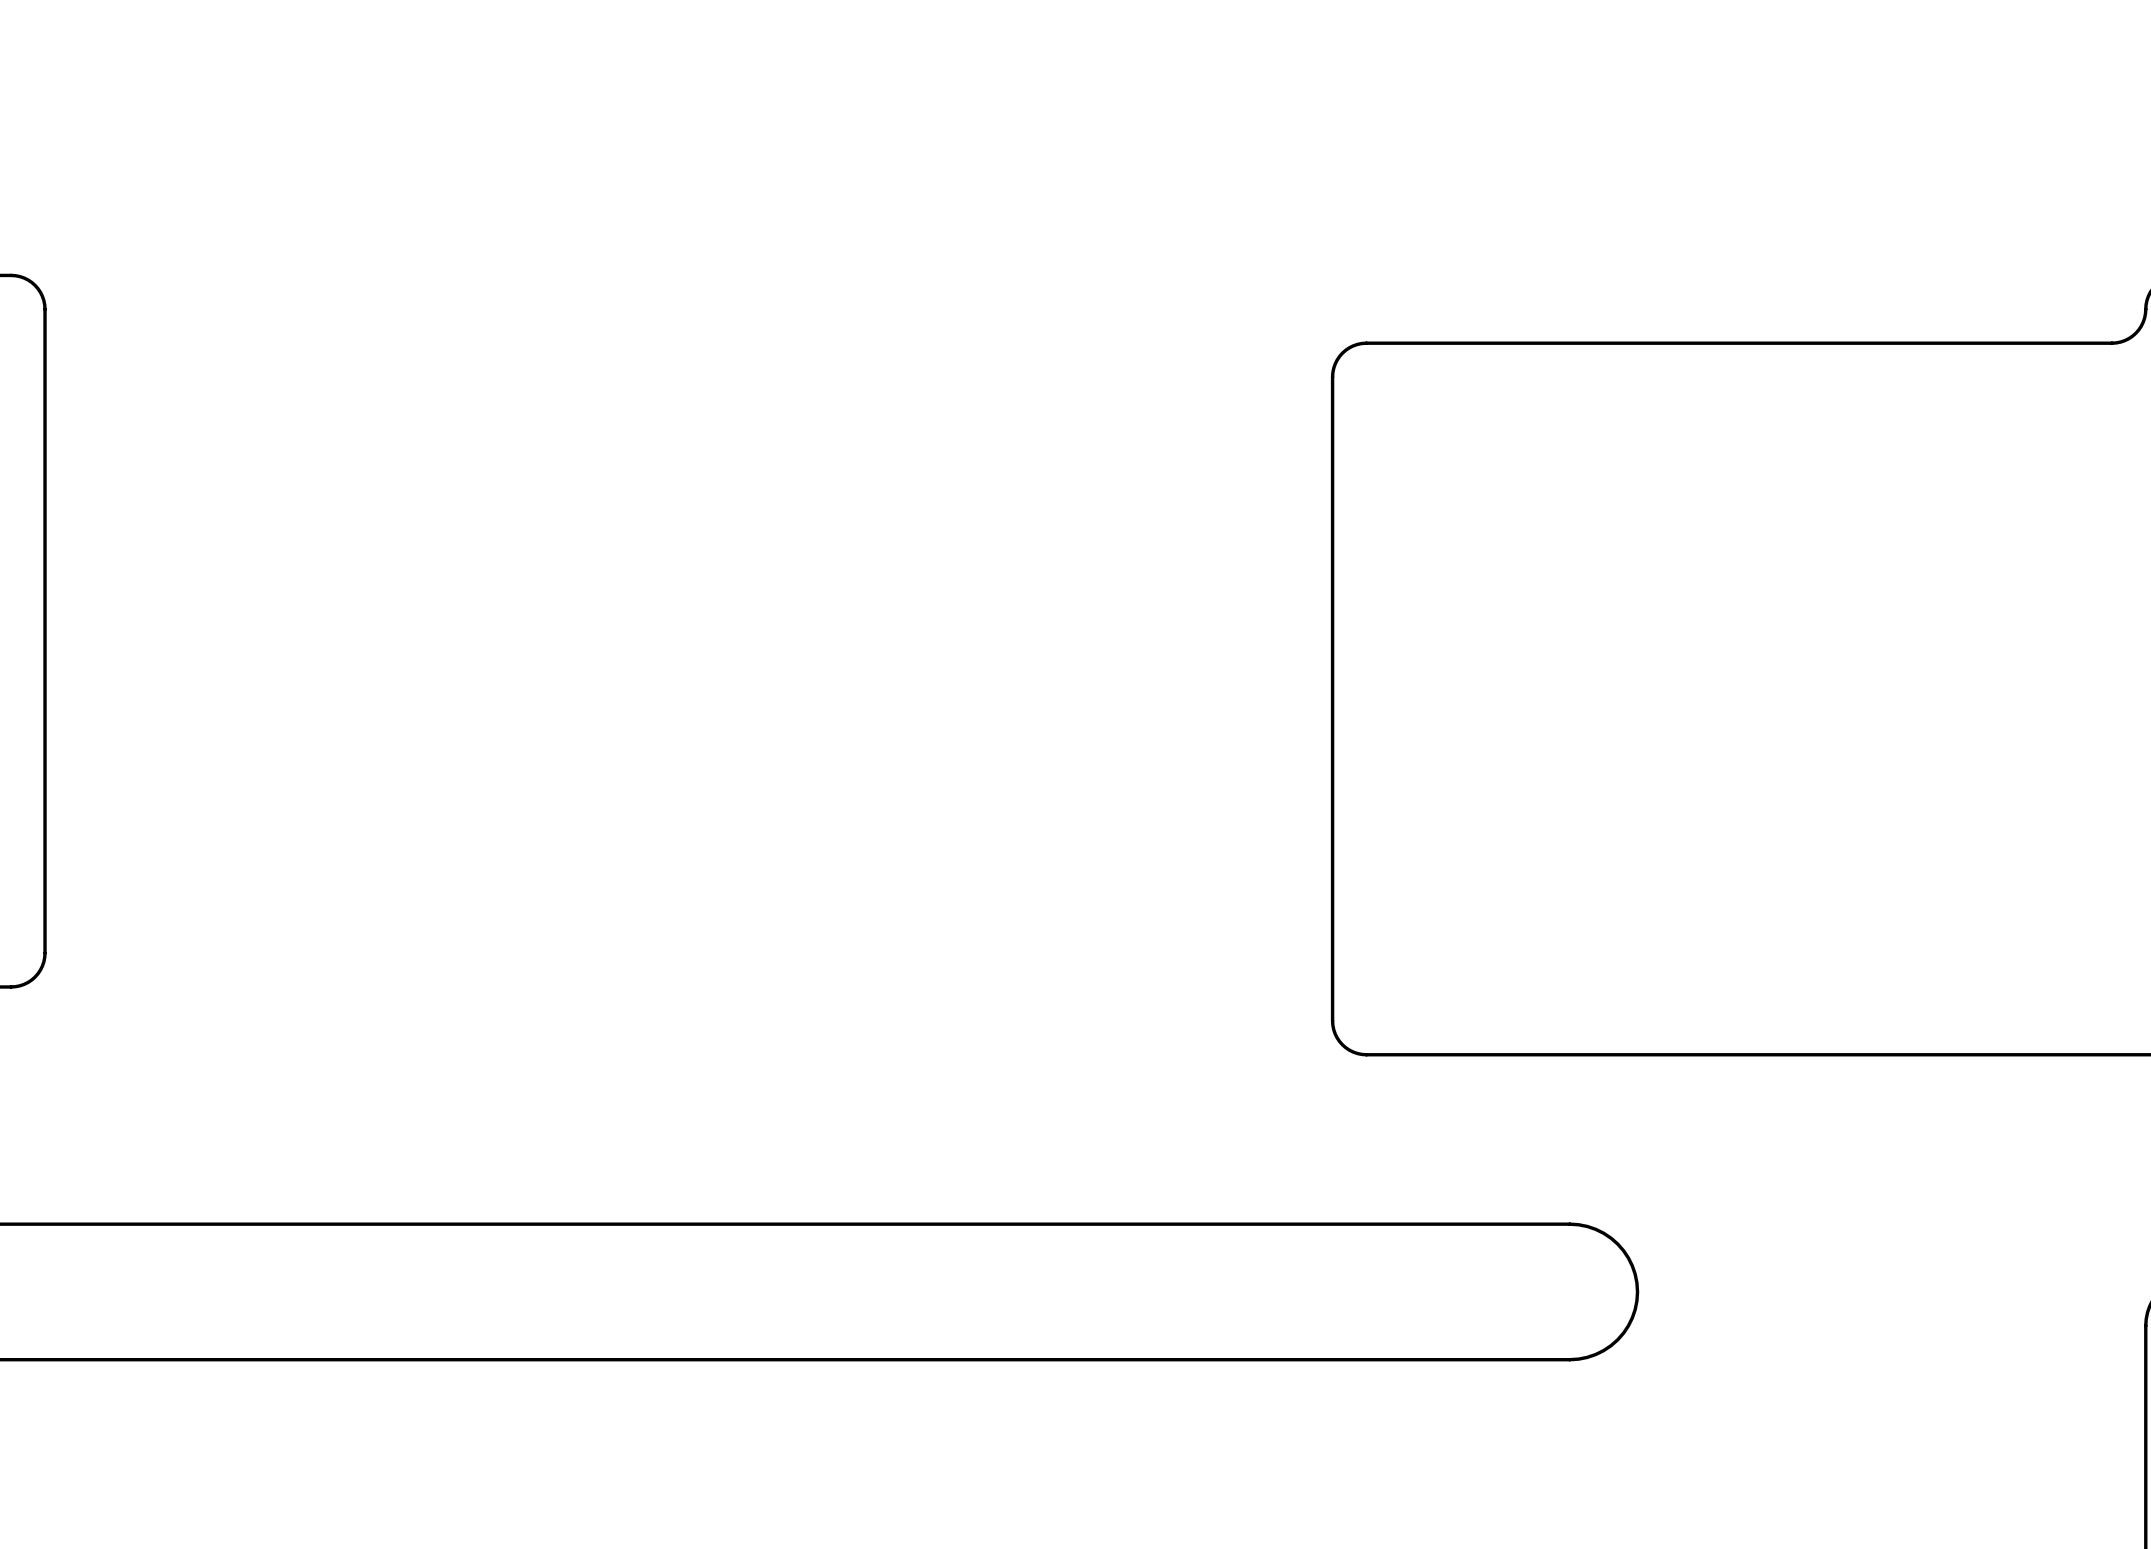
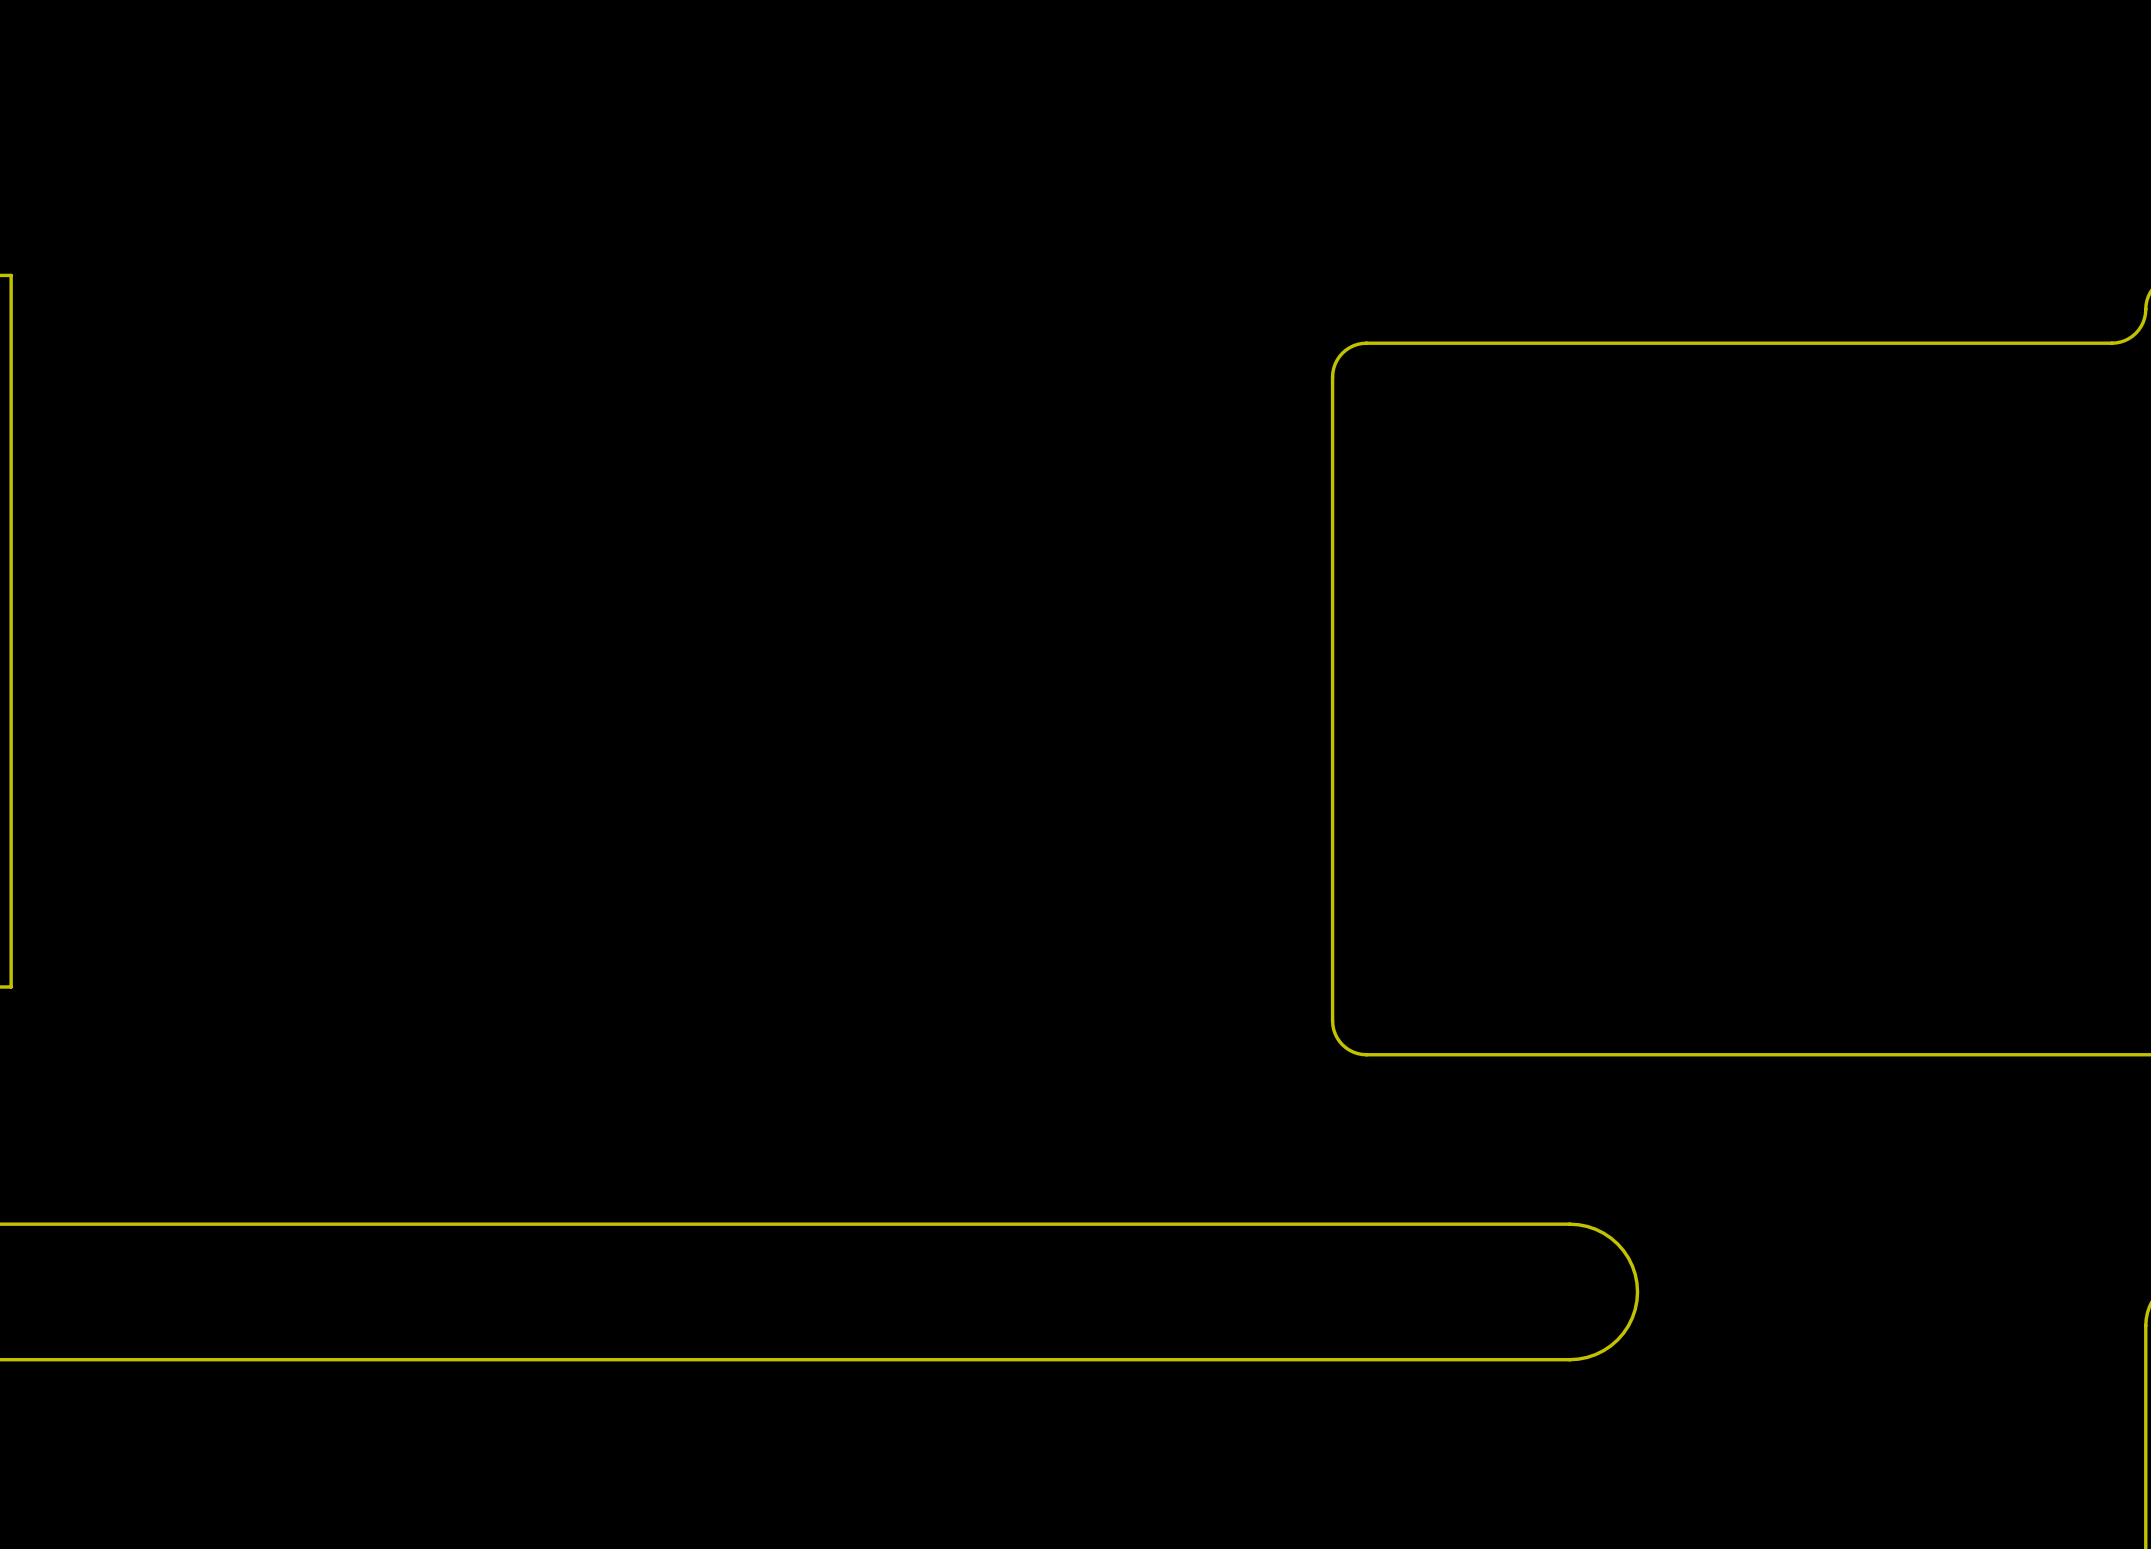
board edge: (11, 275) (24, 278) (35, 285) (42, 296) (45, 309) (45, 953) (42, 966) (35, 977) (24, 984) (11, 986) -> (11, 275) (11, 986)

